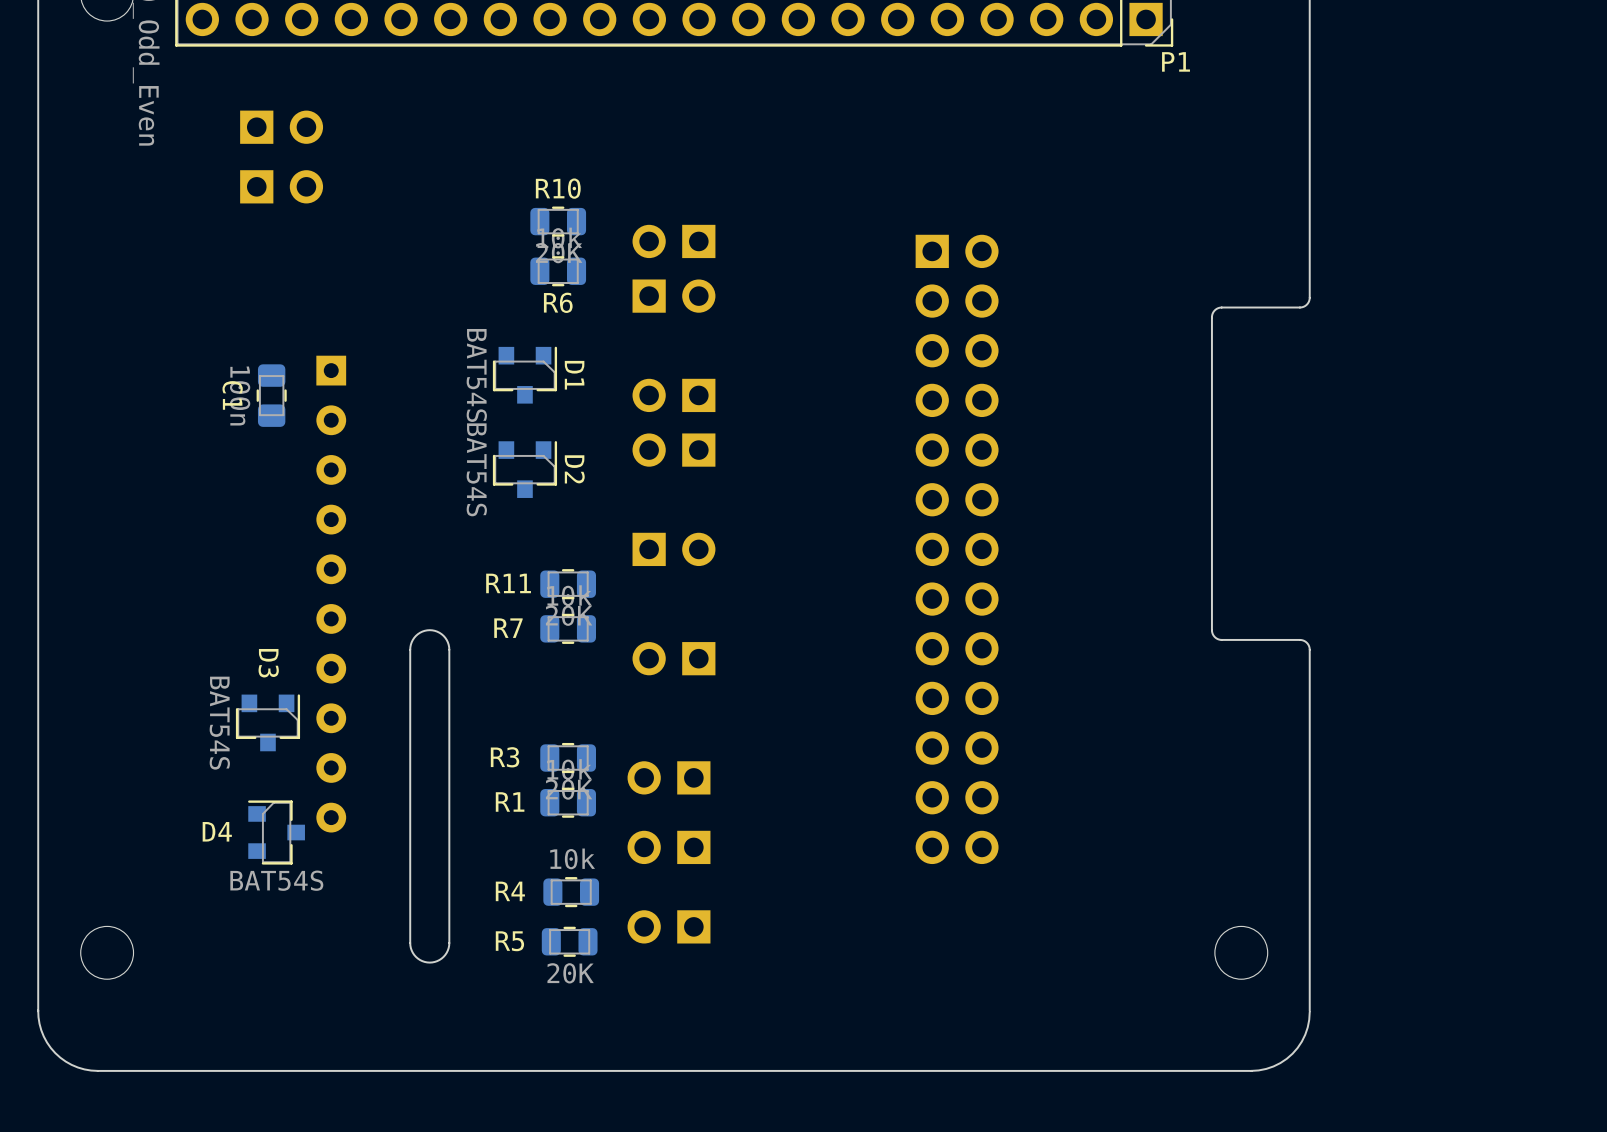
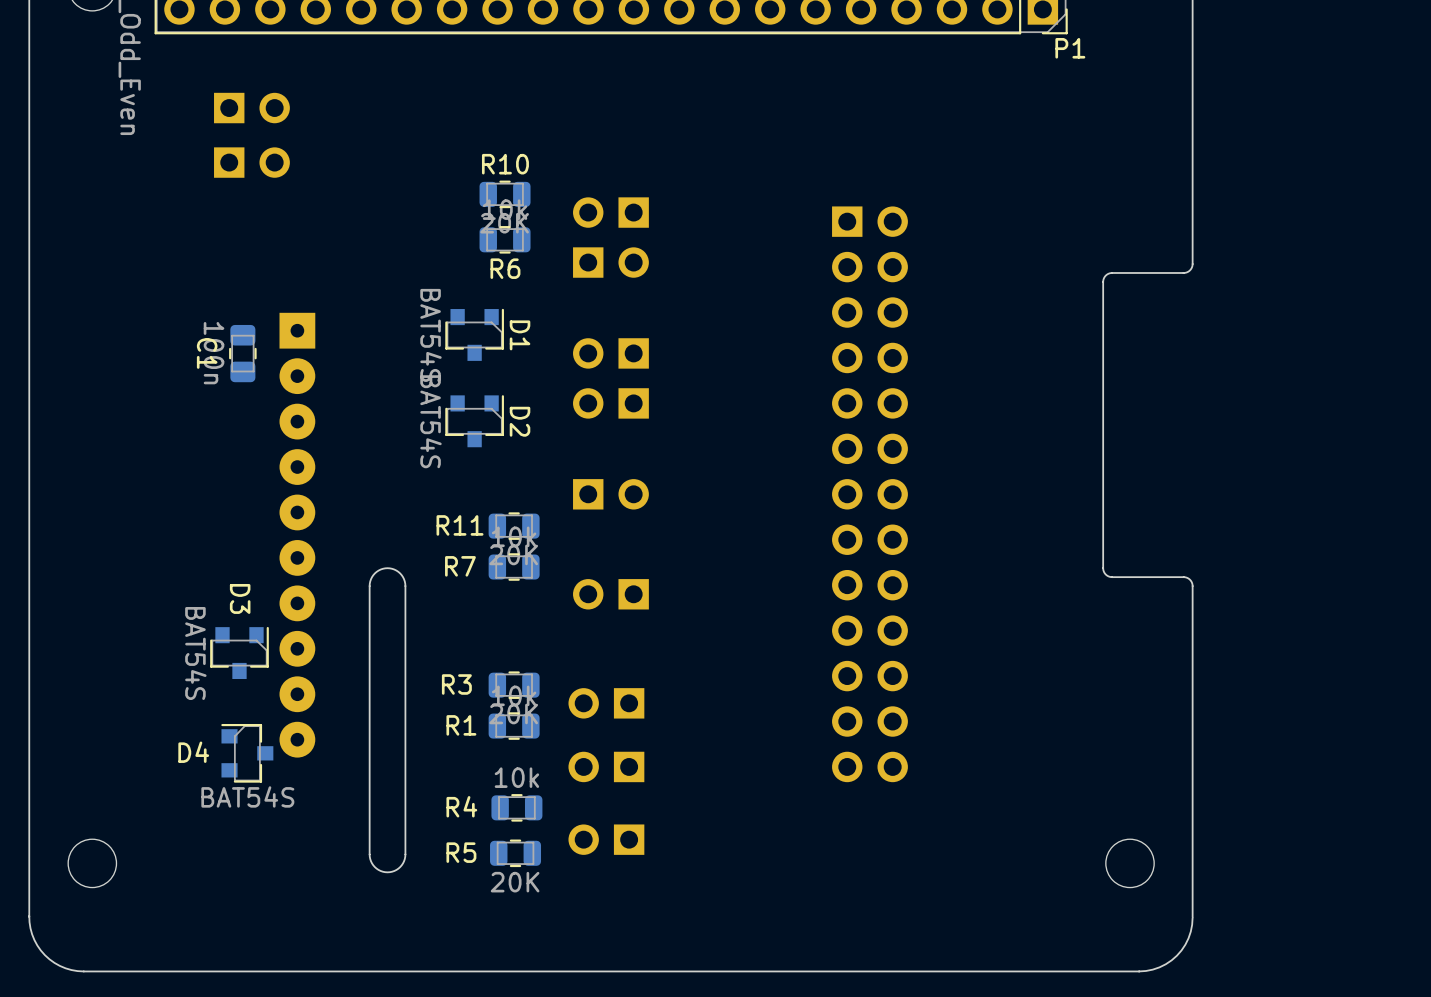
part footprint: [316, 355, 347, 833] -> [279, 312, 316, 758]

